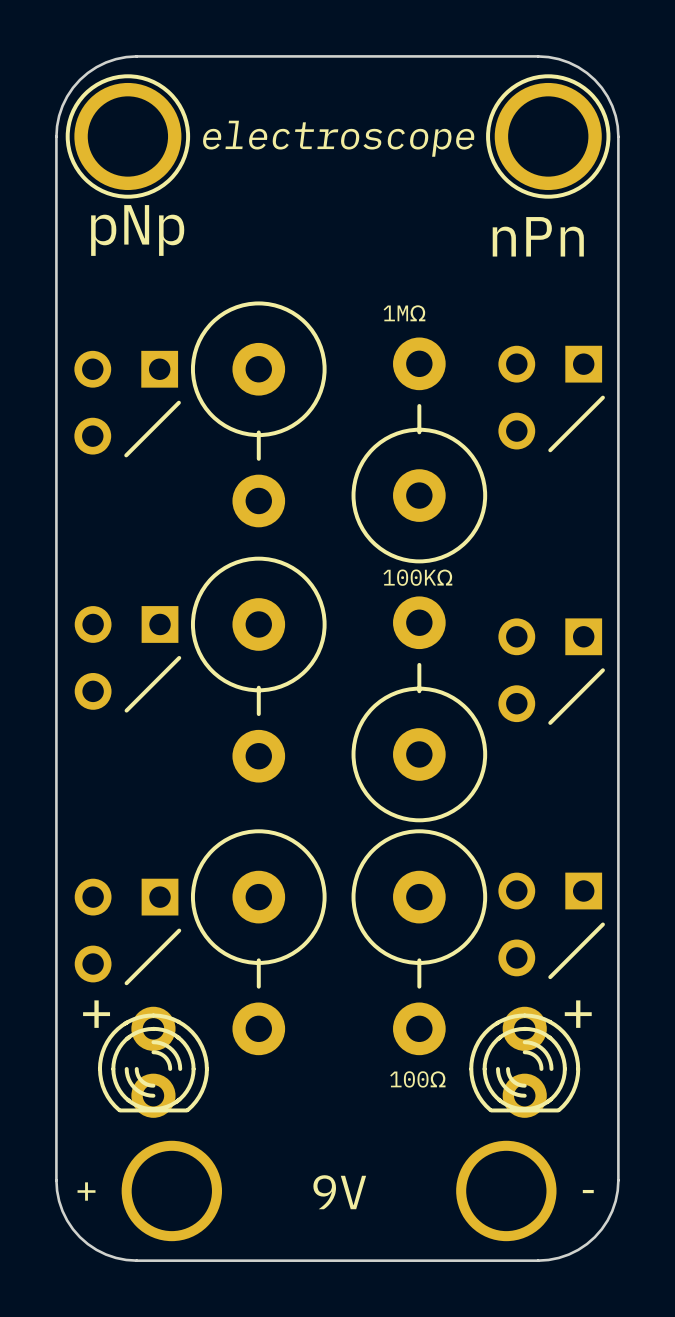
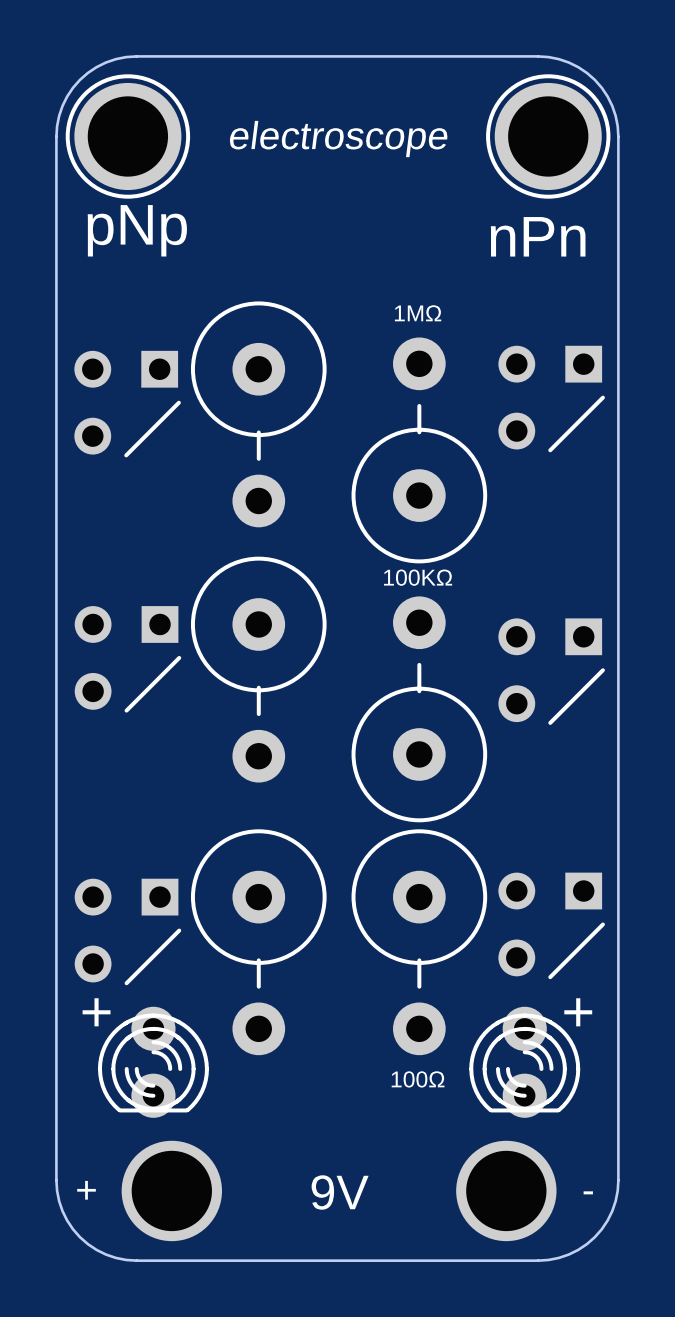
part value position: 1MΩ (404, 313) -> 1MΩ (418, 313)

